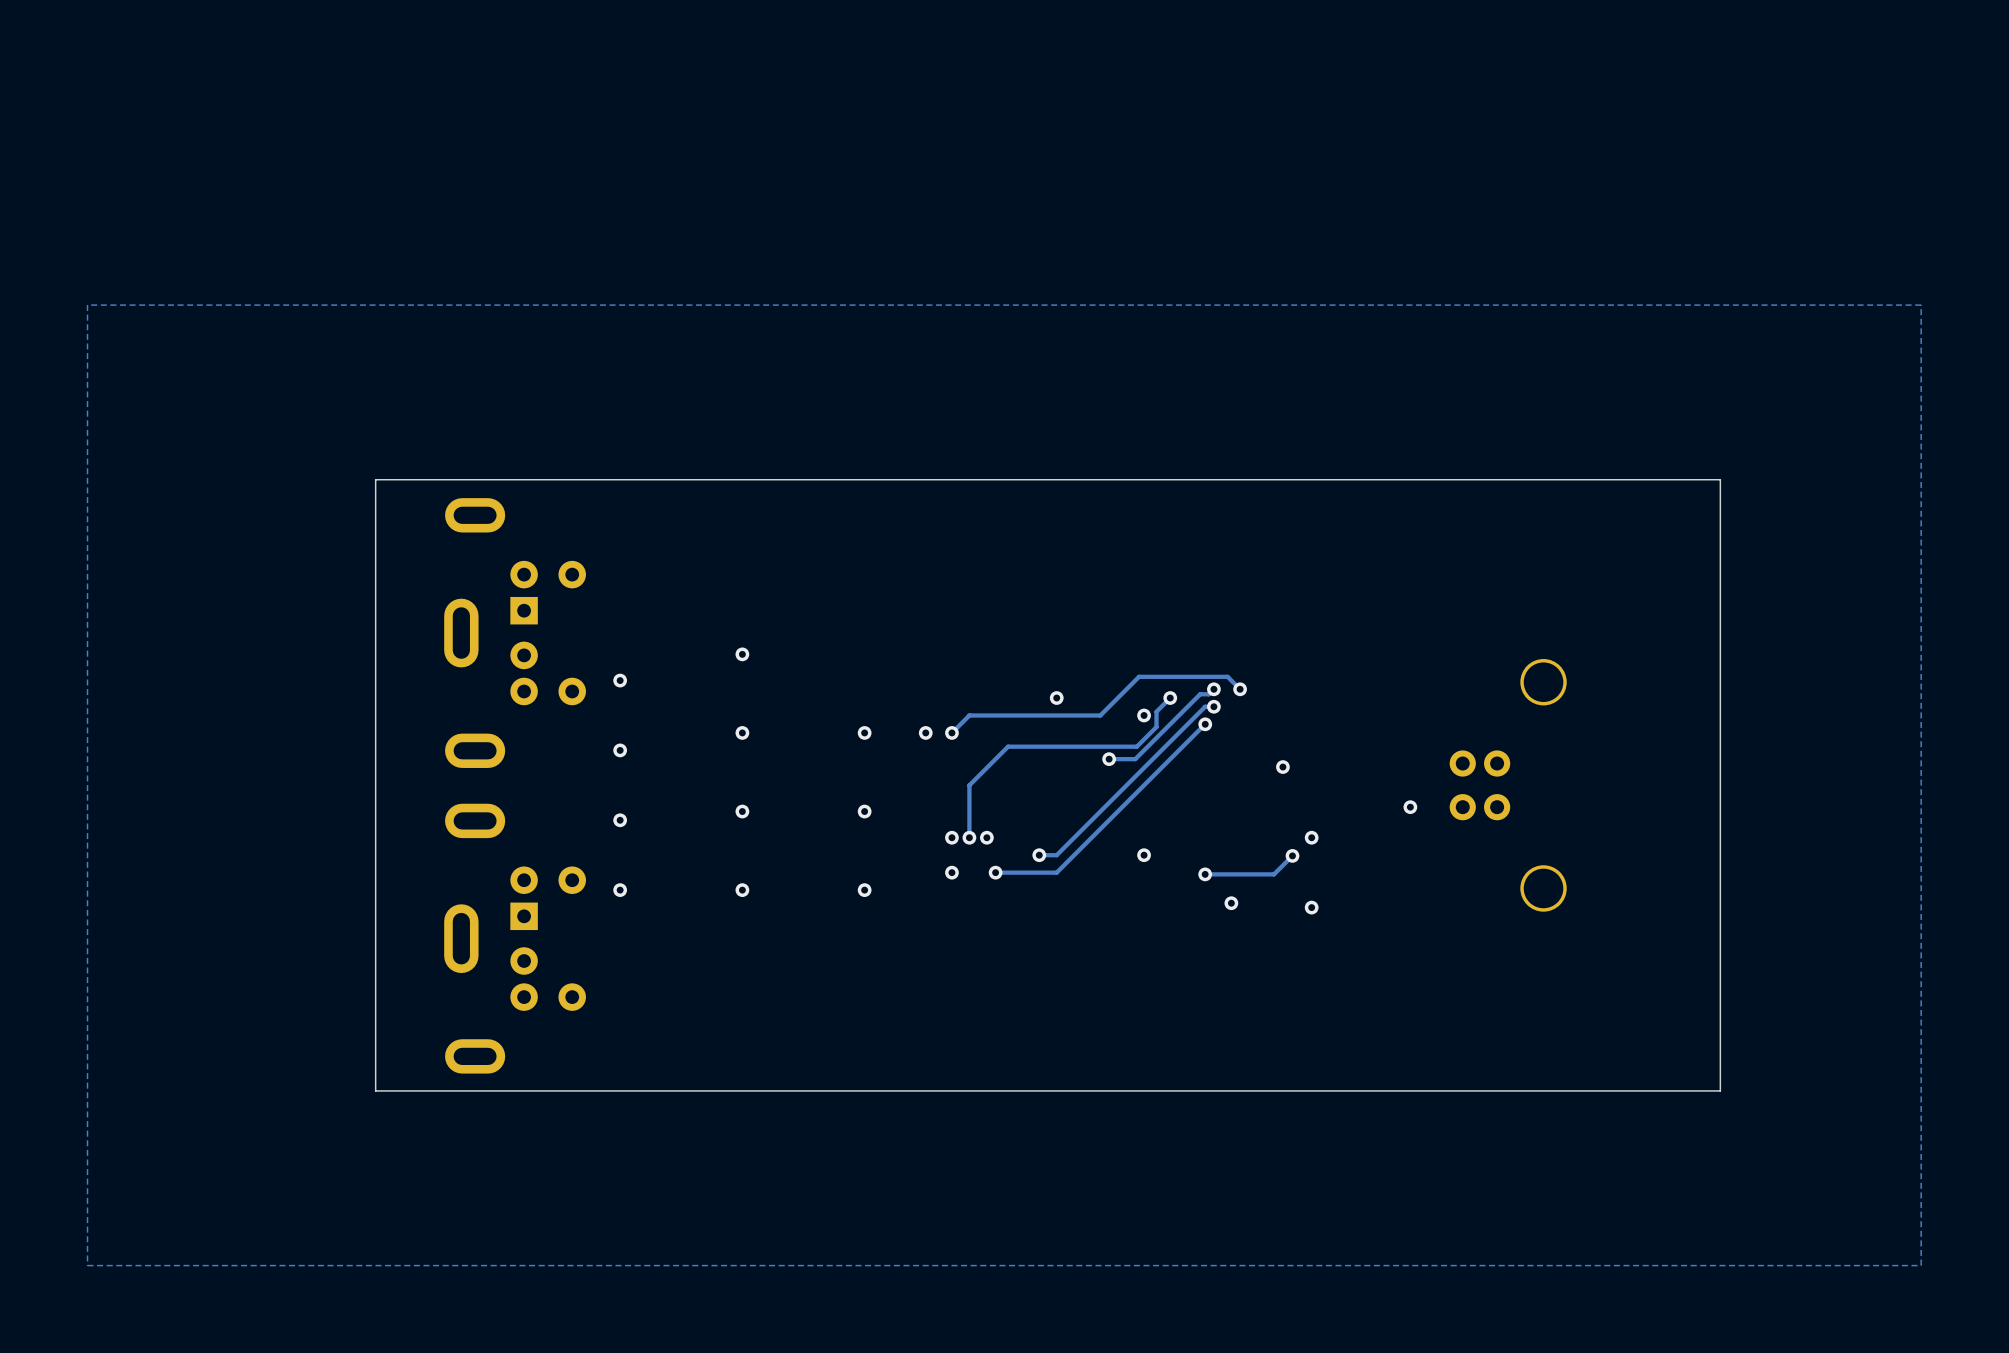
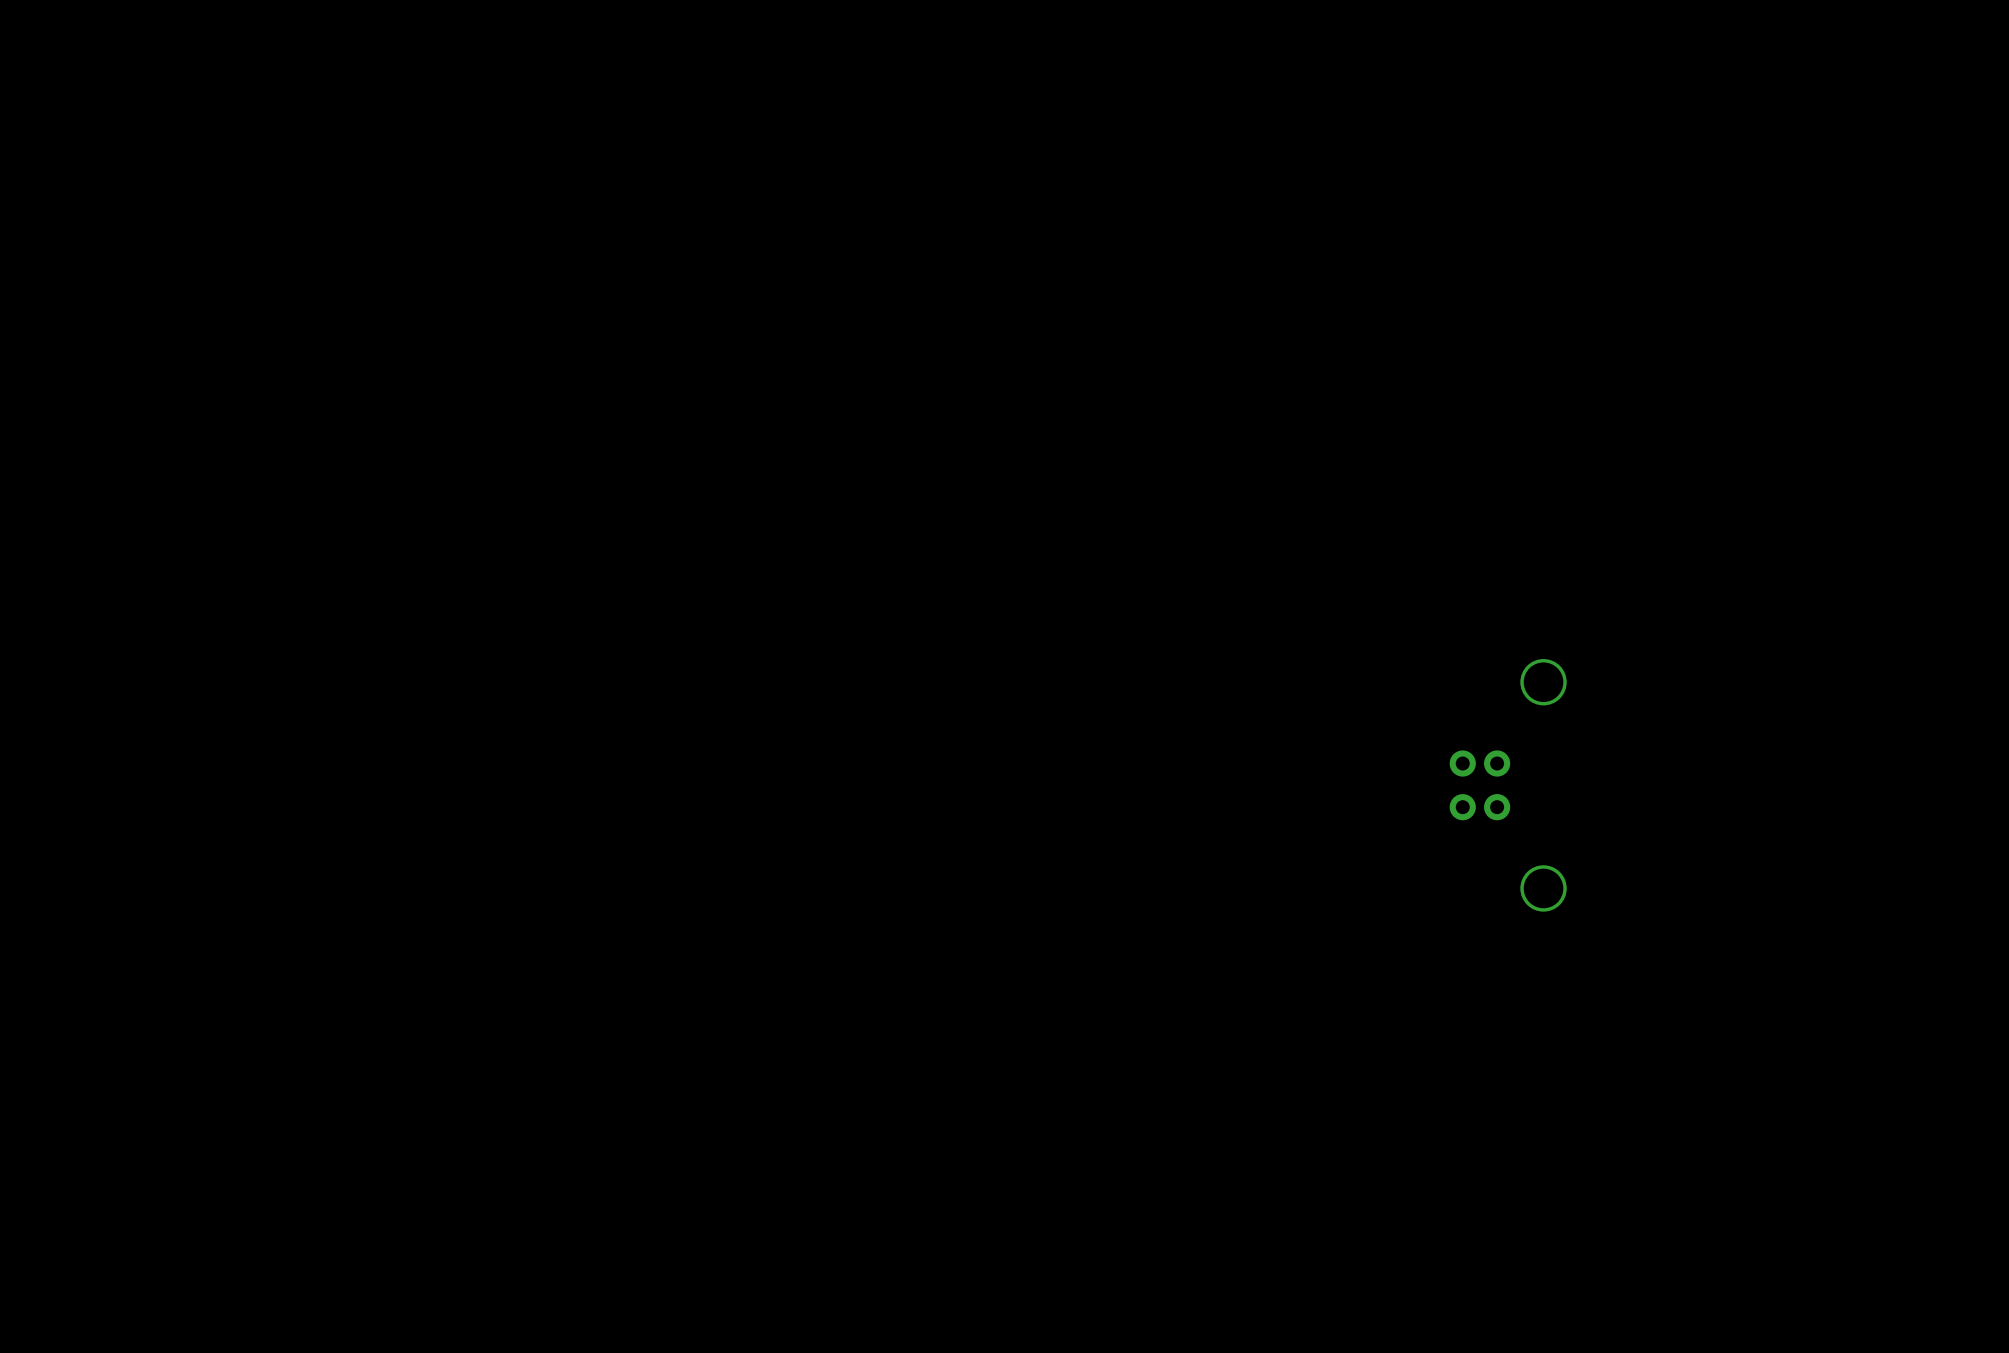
zone outline: (1921, 305) (1921, 1265) (87, 1265) (87, 305) (1921, 305) -> none
board edge: (1720, 479) (1720, 1090) (375, 1090) (375, 479) (1720, 479) -> none
part: (515, 633) -> none
via: (742, 654) -> none
via: (620, 680) -> none
track: (1213, 689) (1208, 694) (1200, 694) (1135, 759) (1109, 759) -> none
via: (1213, 689) -> none
track: (1240, 689) (1227, 676) (1139, 676) (1100, 715) (969, 715) (951, 732) -> none
via: (1240, 689) -> none
via: (1056, 698) -> none
track: (1170, 698) (1156, 711) (1156, 727) (1136, 746) (1008, 746) (969, 785) (969, 837) -> none
via: (1170, 698) -> none
track: (1213, 706) (1205, 706) (1056, 855) (1039, 855) -> none
via: (1213, 706) -> none
via: (1144, 715) -> none
track: (1205, 724) (1056, 872) (995, 872) -> none
via: (1205, 724) -> none
via: (742, 732) -> none
via: (864, 732) -> none
via: (925, 732) -> none
via: (951, 732) -> none
via: (620, 750) -> none
via: (1109, 759) -> none
via: (1282, 767) -> none
via: (1410, 807) -> none
via: (742, 811) -> none
via: (864, 811) -> none
via: (620, 820) -> none
via: (951, 837) -> none
via: (969, 837) -> none
via: (986, 837) -> none
via: (1311, 837) -> none
via: (1039, 855) -> none
via: (1144, 855) -> none
track: (1292, 855) (1274, 874) (1205, 874) -> none
via: (1292, 855) -> none
via: (951, 872) -> none
via: (995, 872) -> none
via: (1205, 874) -> none
via: (620, 890) -> none
via: (742, 890) -> none
via: (864, 890) -> none
via: (1231, 903) -> none
via: (1311, 907) -> none
part: (515, 938) -> none

